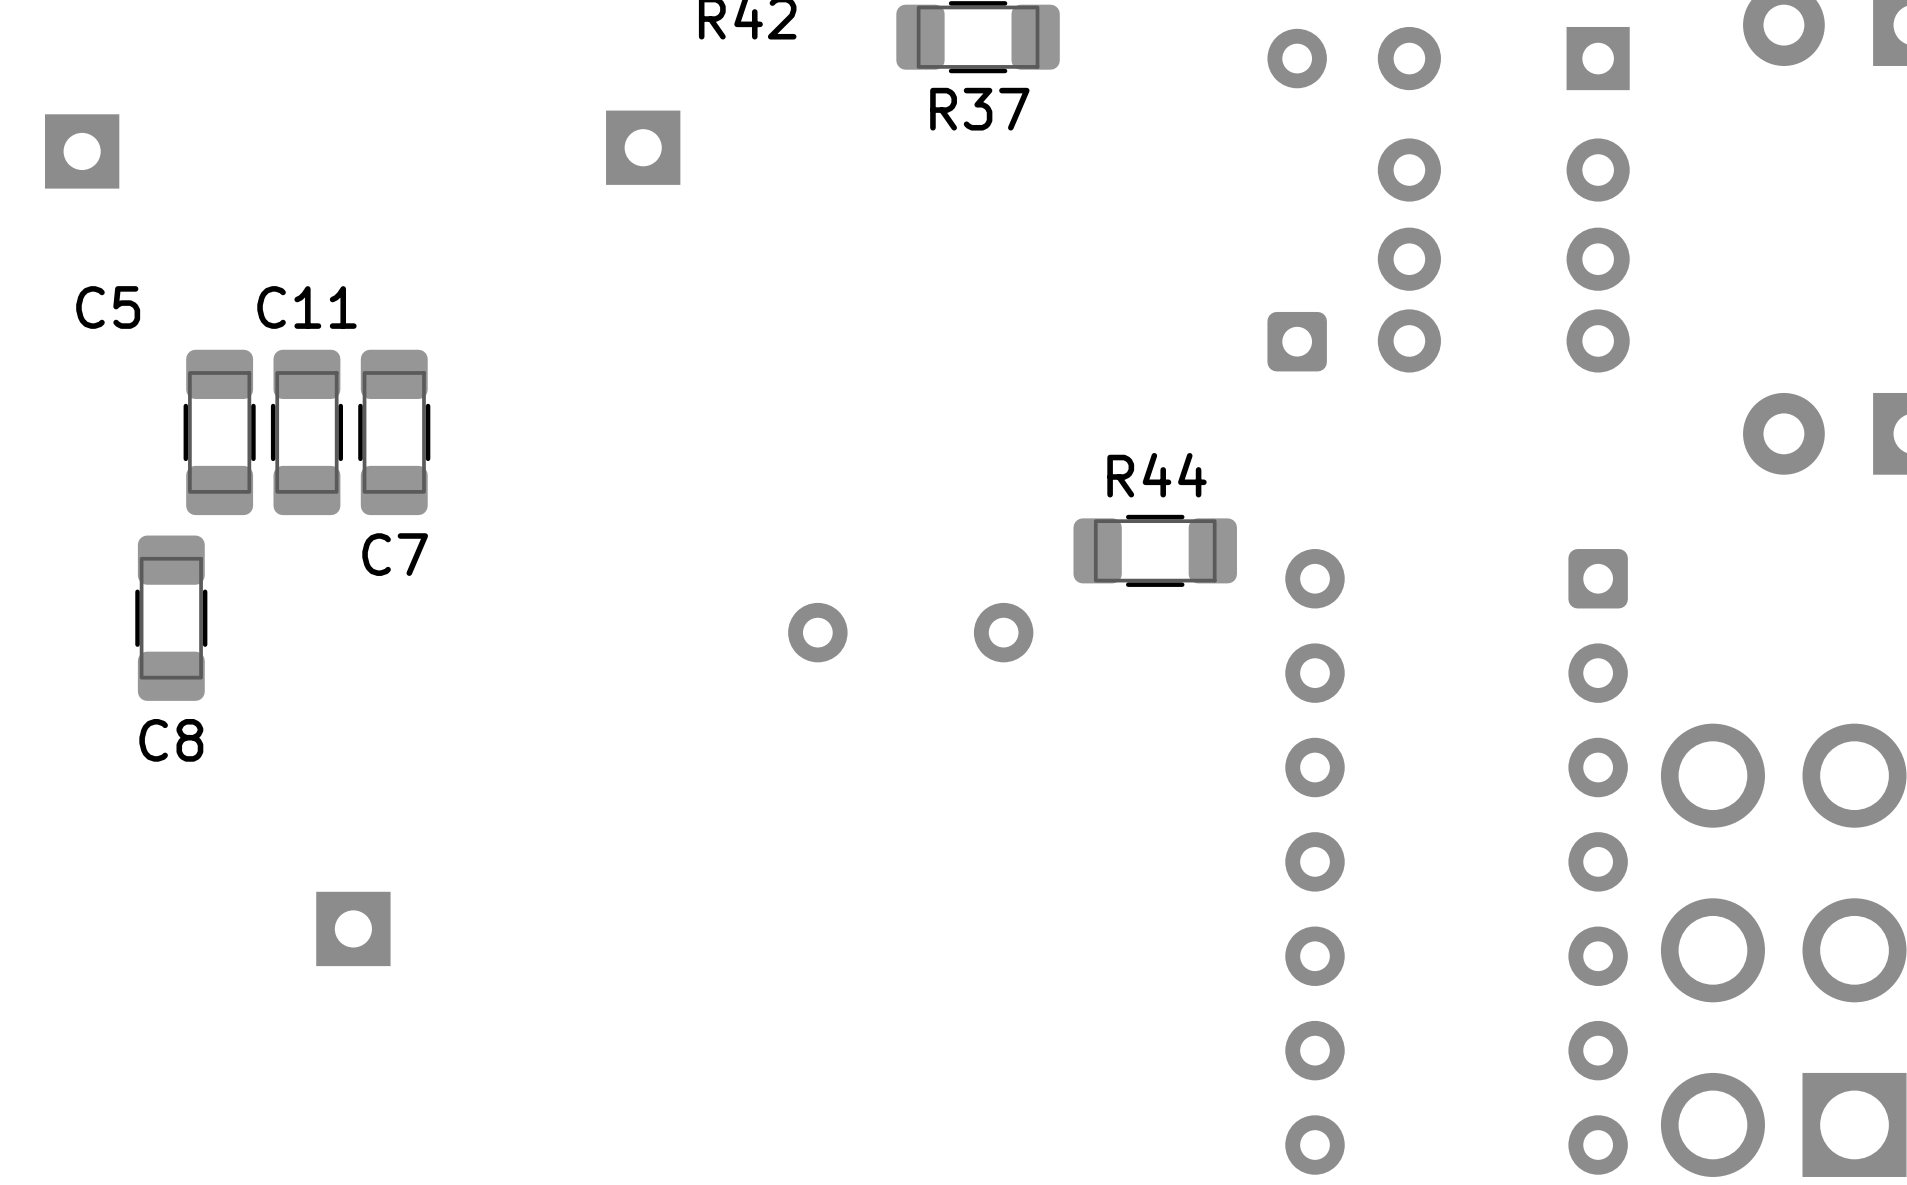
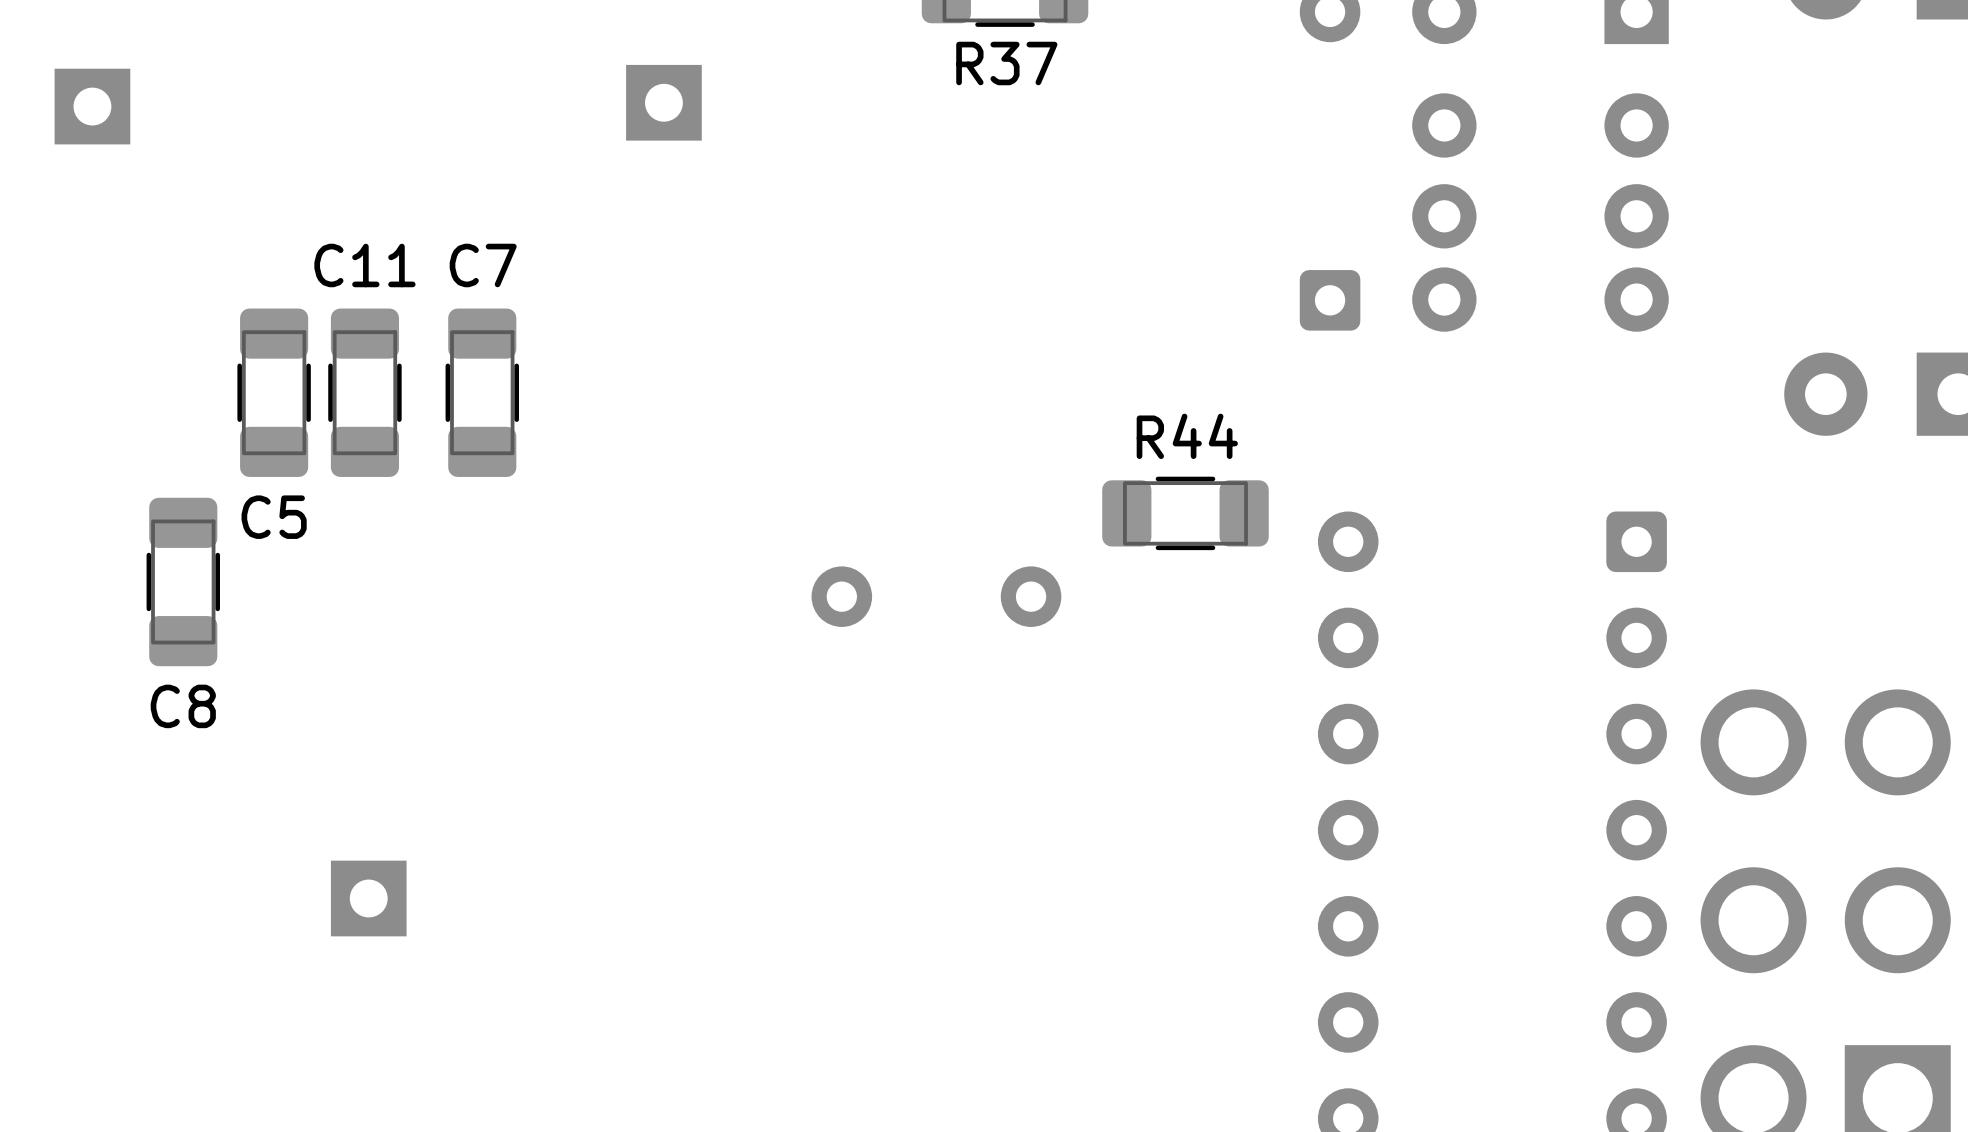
C5 name position: C5 (108, 307) -> C5 (274, 517)
C5 position: (219, 432) -> (274, 392)
C11 position: (306, 432) -> (364, 392)
C7 position: (394, 432) -> (482, 392)
C7 name position: C7 (395, 554) -> C7 (483, 265)

